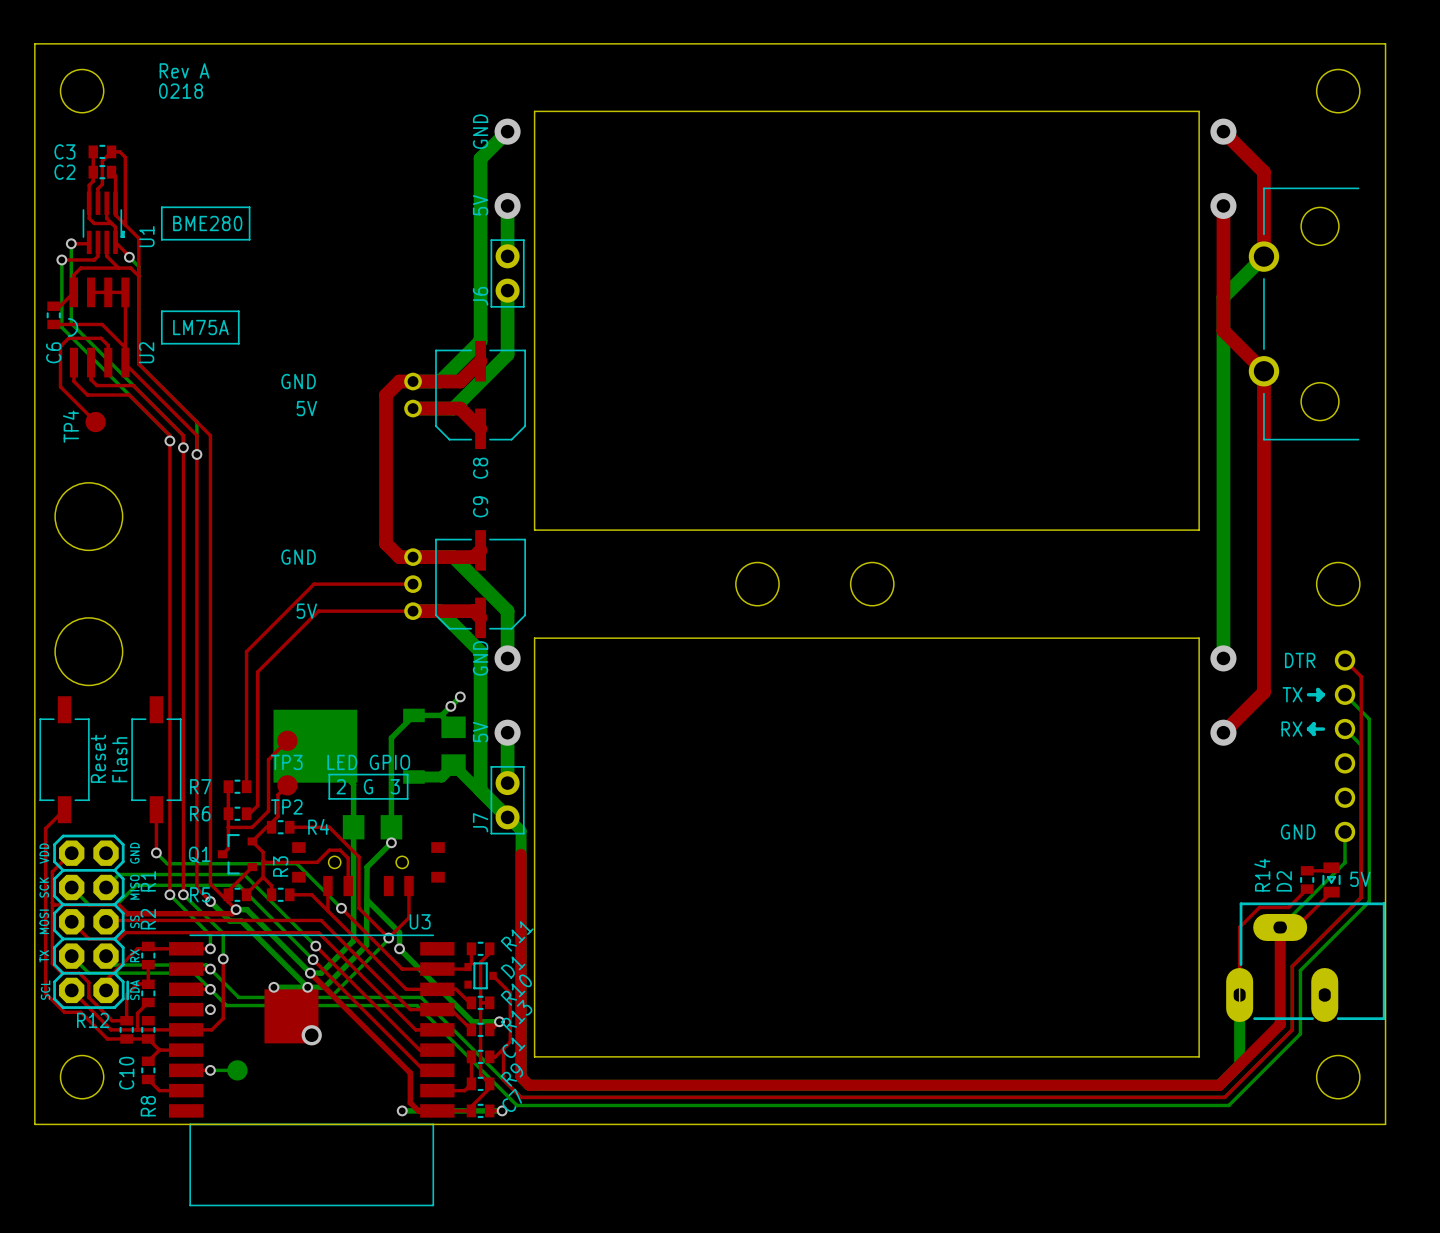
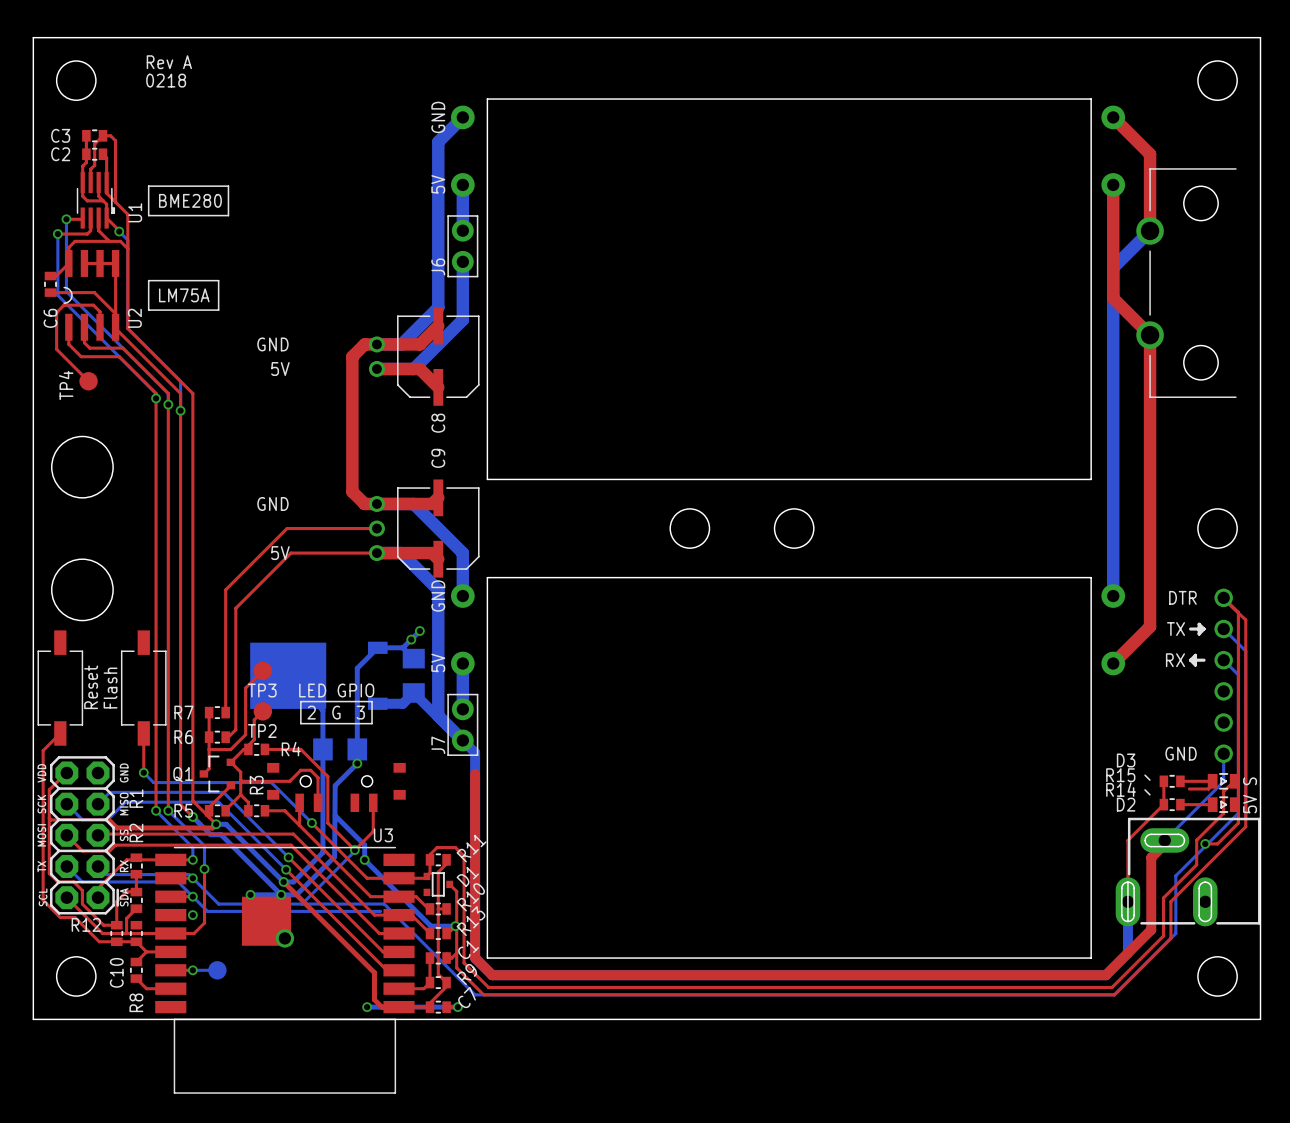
top track: none -> (1222, 597) (1245, 619) (1245, 826) (1170, 901) (1170, 938)
line: none -> (1145, 775) (1149, 780)
top track: none -> (1163, 781) (1163, 804)
R15: none -> (1172, 781)
top track: none -> (1180, 781) (1212, 781)
D3: none -> (1223, 781)
top track: none -> (1234, 781) (1223, 791) (1223, 813) (1196, 840) (1196, 864) (1163, 897) (1163, 935) (1112, 987) (488, 987) (464, 962) (464, 856) (455, 847) (437, 847) (430, 854) (430, 859)
text: none -> S (1250, 781)
line: none -> (1145, 789) (1149, 794)
R14 rotation: 0° (1307, 879) -> 90° clockwise (1172, 804)
R14 position: (1307, 879) -> (1172, 804)
D2 rotation: 0° (1331, 879) -> 90° counterclockwise (1223, 804)
text rotation: 0° (1360, 879) -> 90° counterclockwise (1250, 804)
D2 name position: D2 (1284, 881) -> D2 (1126, 804)
top track: none -> (1180, 804) (1212, 804)
top track: (1307, 889) (1288, 907) (1259, 907) -> (1163, 804) (1146, 822)
top track: (1331, 892) (1296, 927) (1280, 927) (1280, 1024) (1219, 1085) (529, 1085) (521, 1077) (521, 1056) -> (1164, 844) (1151, 857) (1151, 929) (1105, 975) (492, 975) (475, 958)
top track: (1361, 897) (1292, 966) (1292, 1029) (1286, 1035) -> (1238, 813) (1238, 823) (1217, 843) (1205, 843)
bottom track: (1369, 901) (1300, 970) (1300, 1033) (1228, 1105) (517, 1105) (417, 1005) -> none
via: none -> (1205, 843)
top track: (500, 983) (510, 993) (510, 1042) (500, 1051) -> (456, 891) (456, 967) (483, 994)
top track: (503, 1048) (503, 1079) (521, 1097) (530, 1097) -> none

